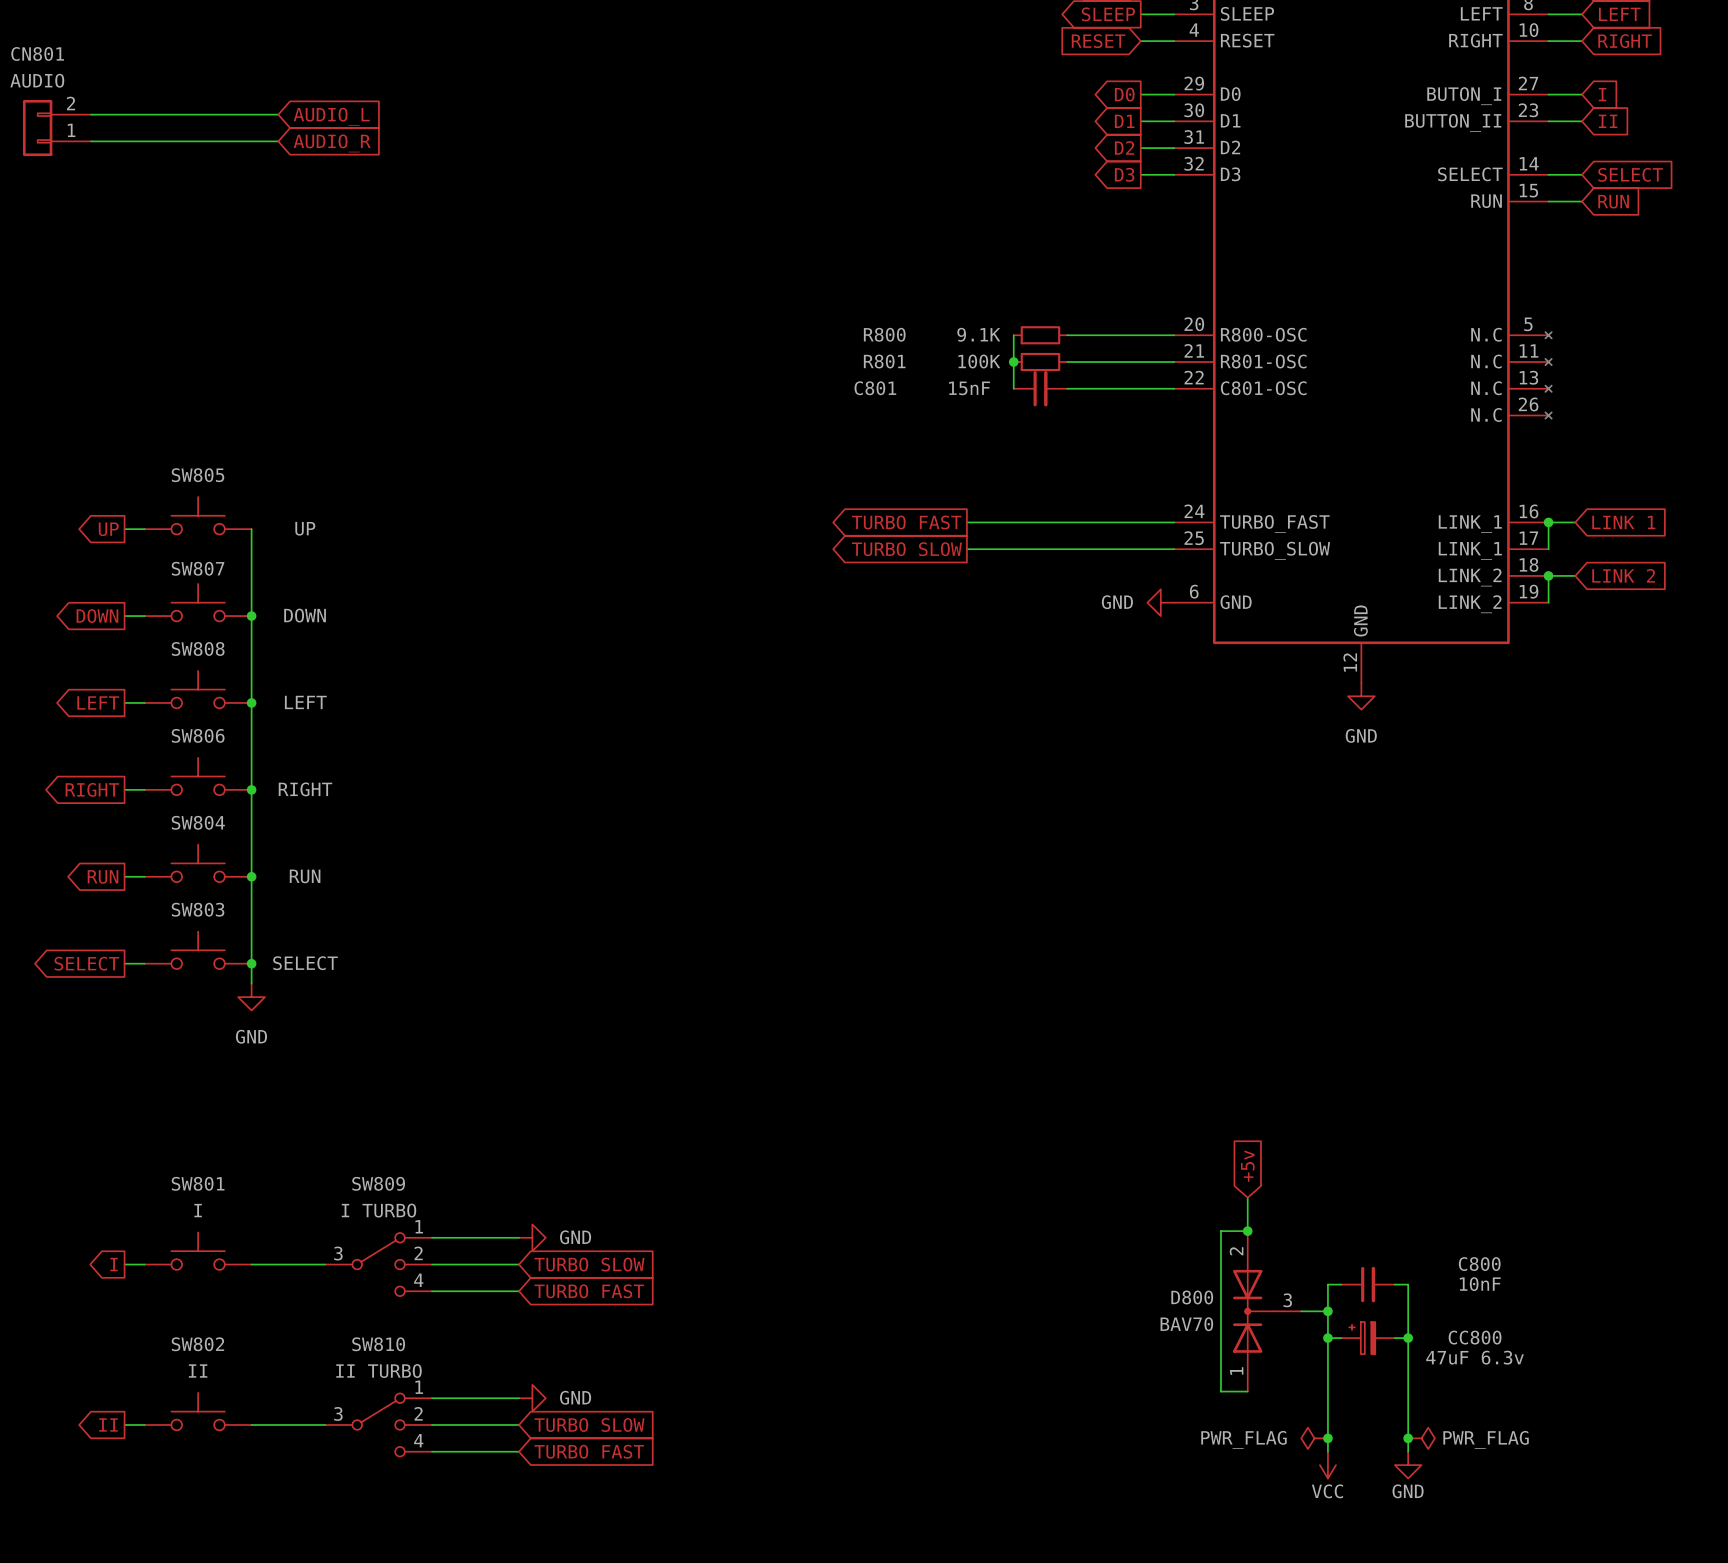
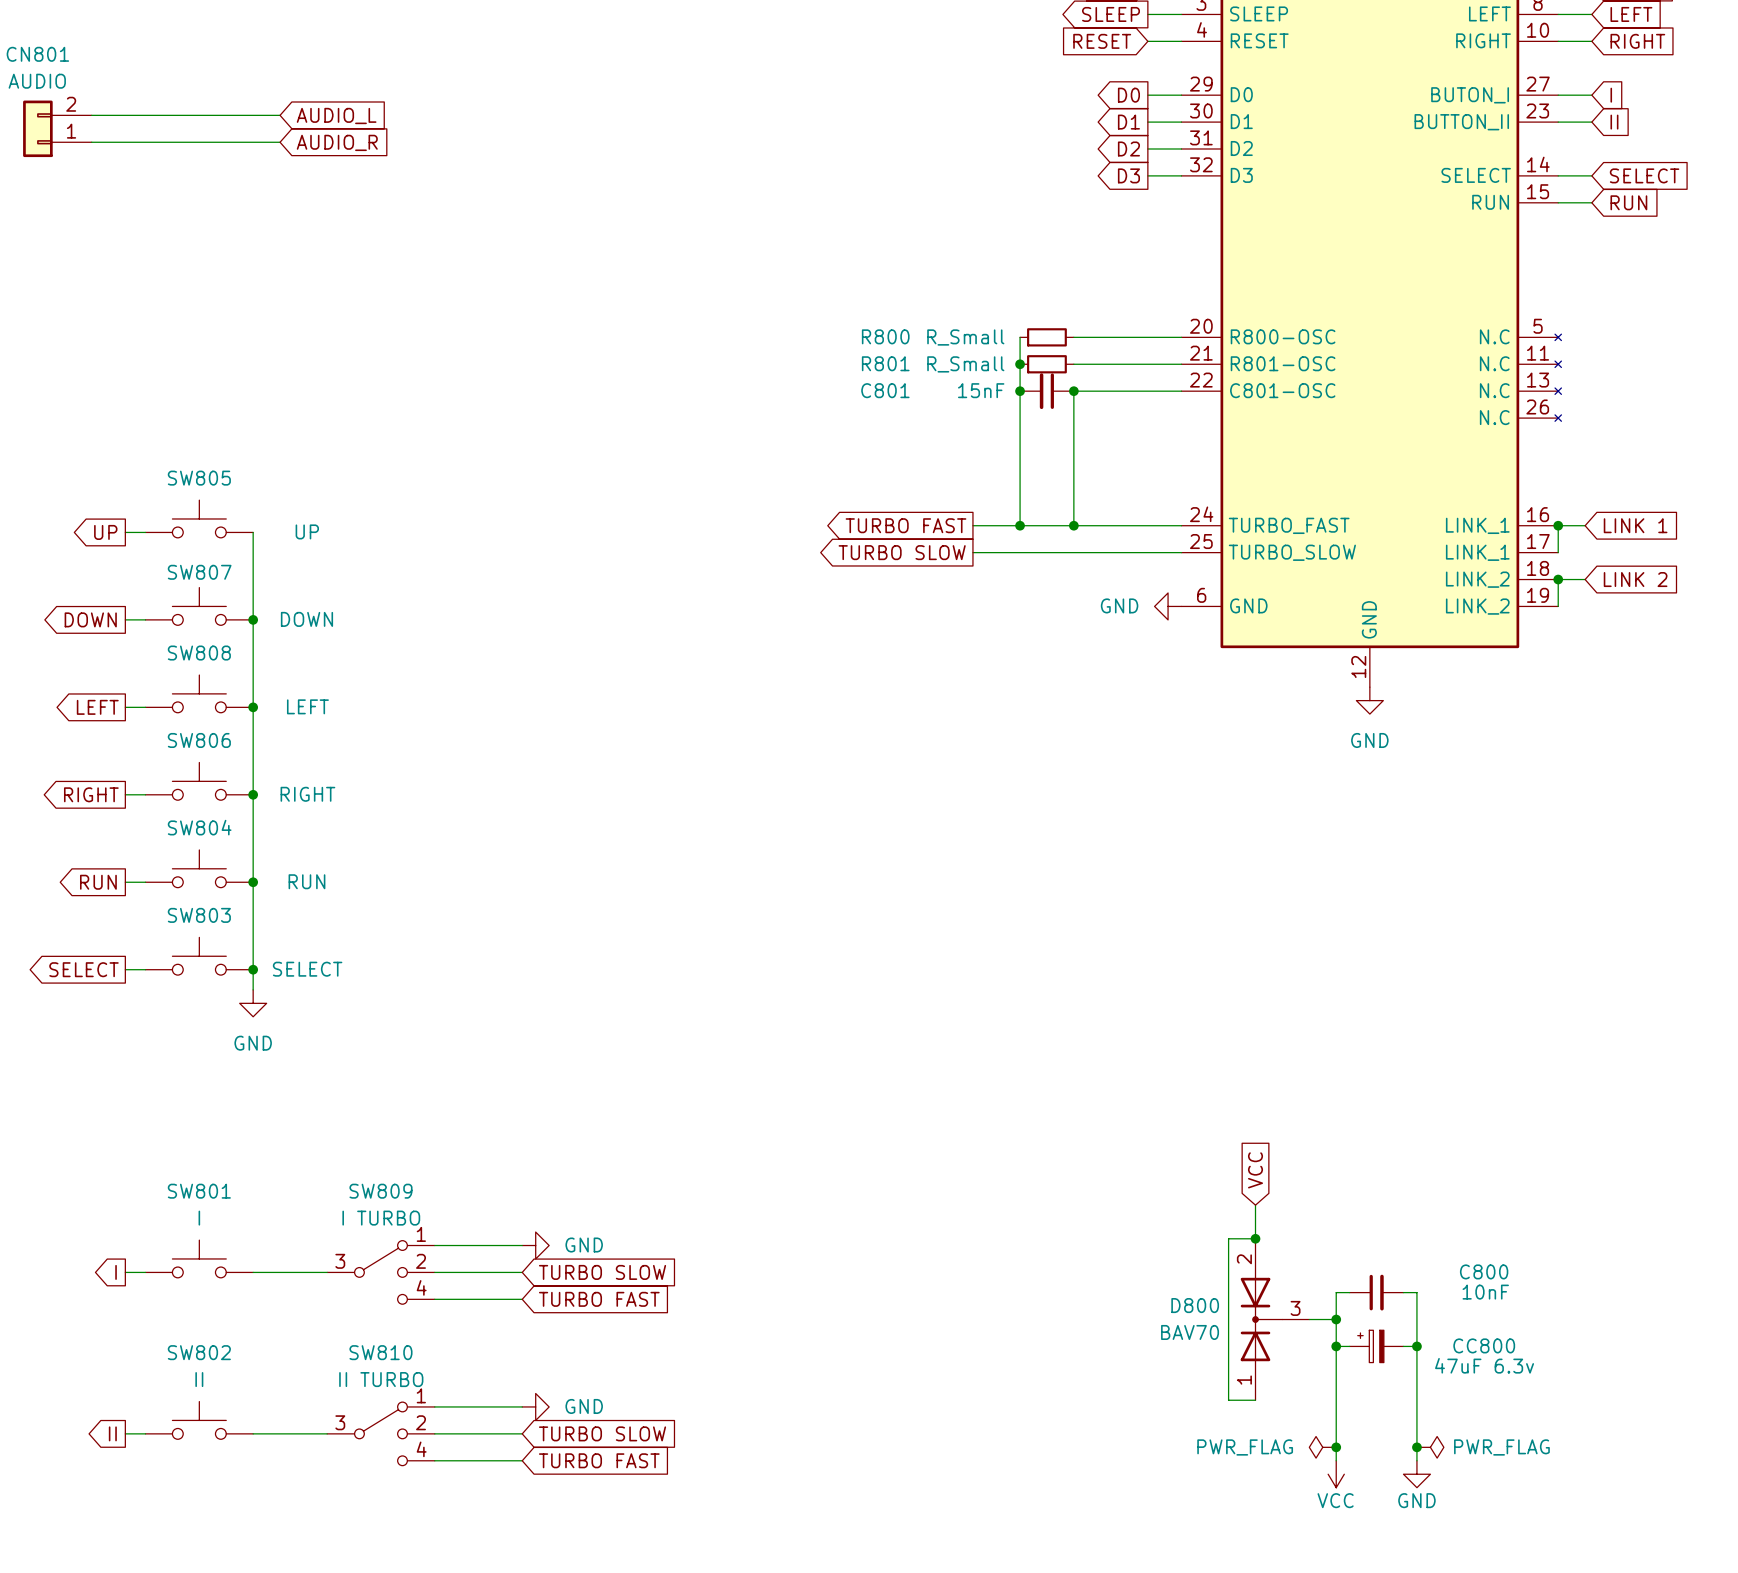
R800 value: 9.1K (978, 334) -> R_Small (965, 337)
R801 value: 100K (979, 361) -> R_Small (965, 364)
wire: none -> (1020, 391) (1020, 525)
junction: none -> (1020, 391)
C801 rotation: 0° (1040, 388) -> 180° (1046, 391)
wire: none -> (1073, 391) (1073, 525)
junction: none -> (1073, 391)
junction: none -> (1020, 525)
junction: none -> (1073, 525)
global label: +5v (1247, 1166) -> VCC (1255, 1170)

